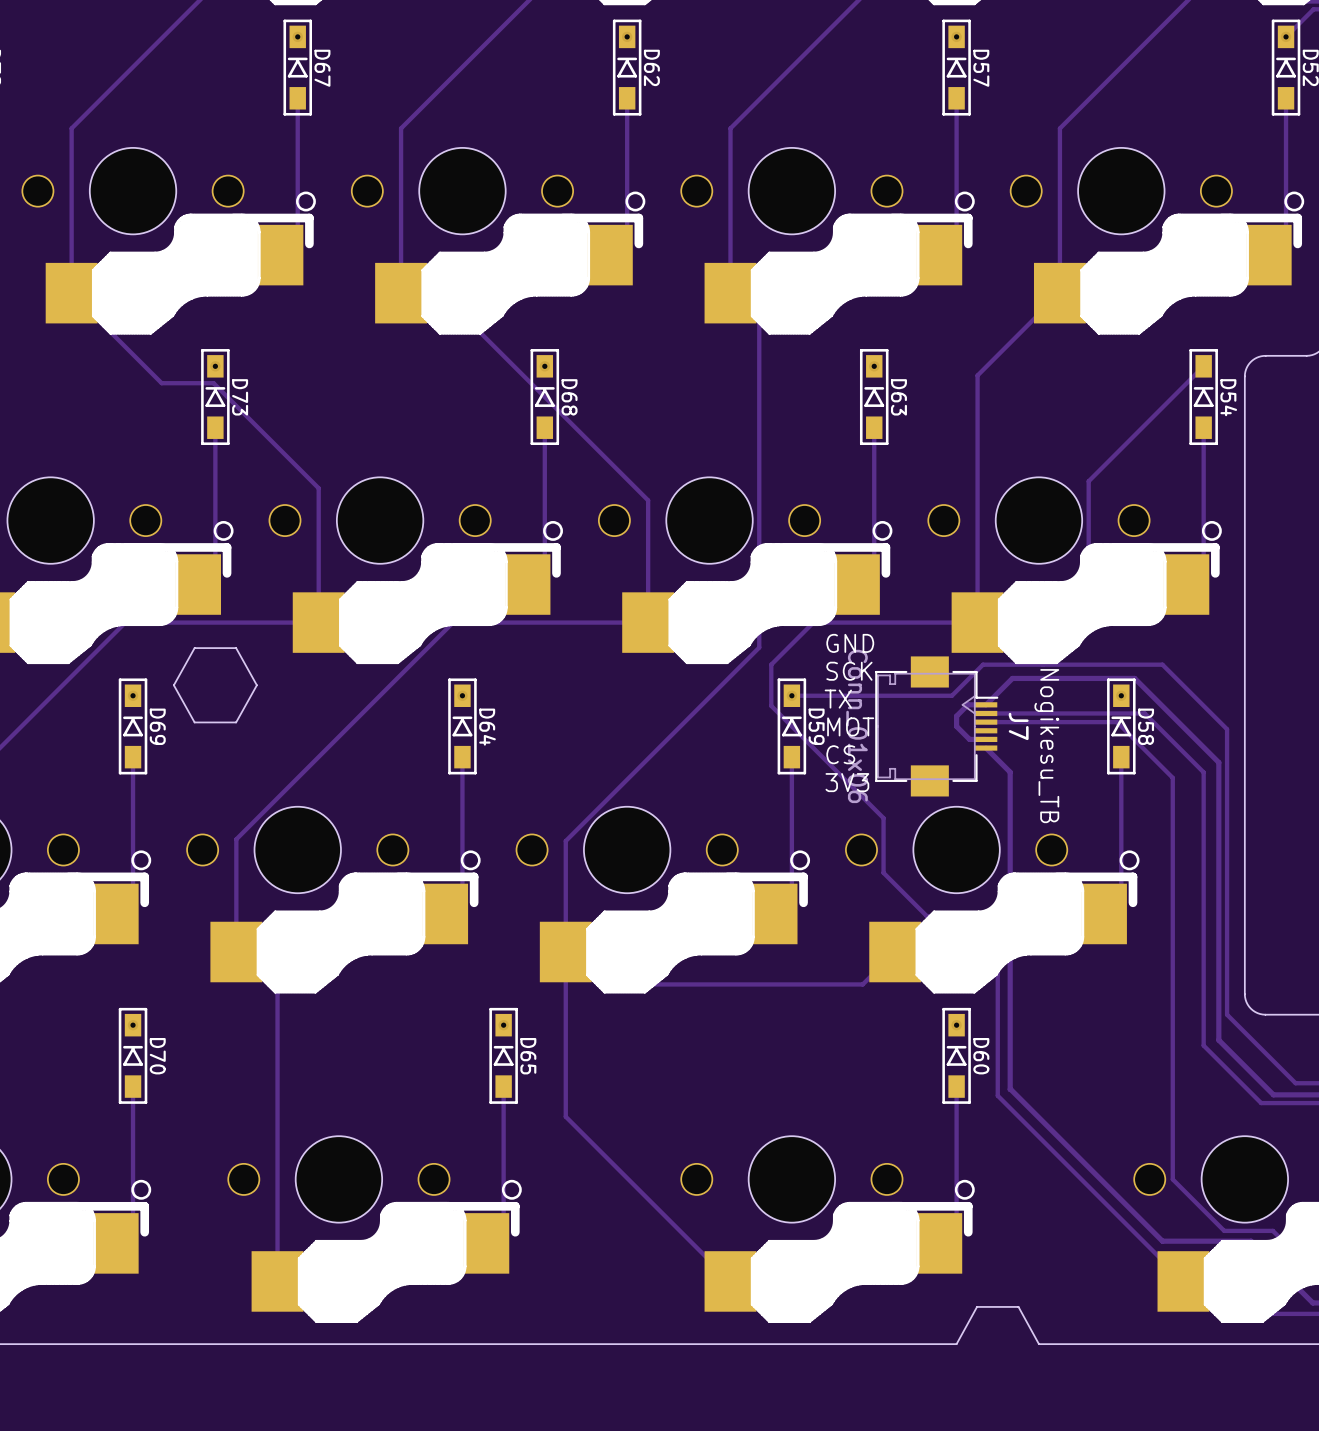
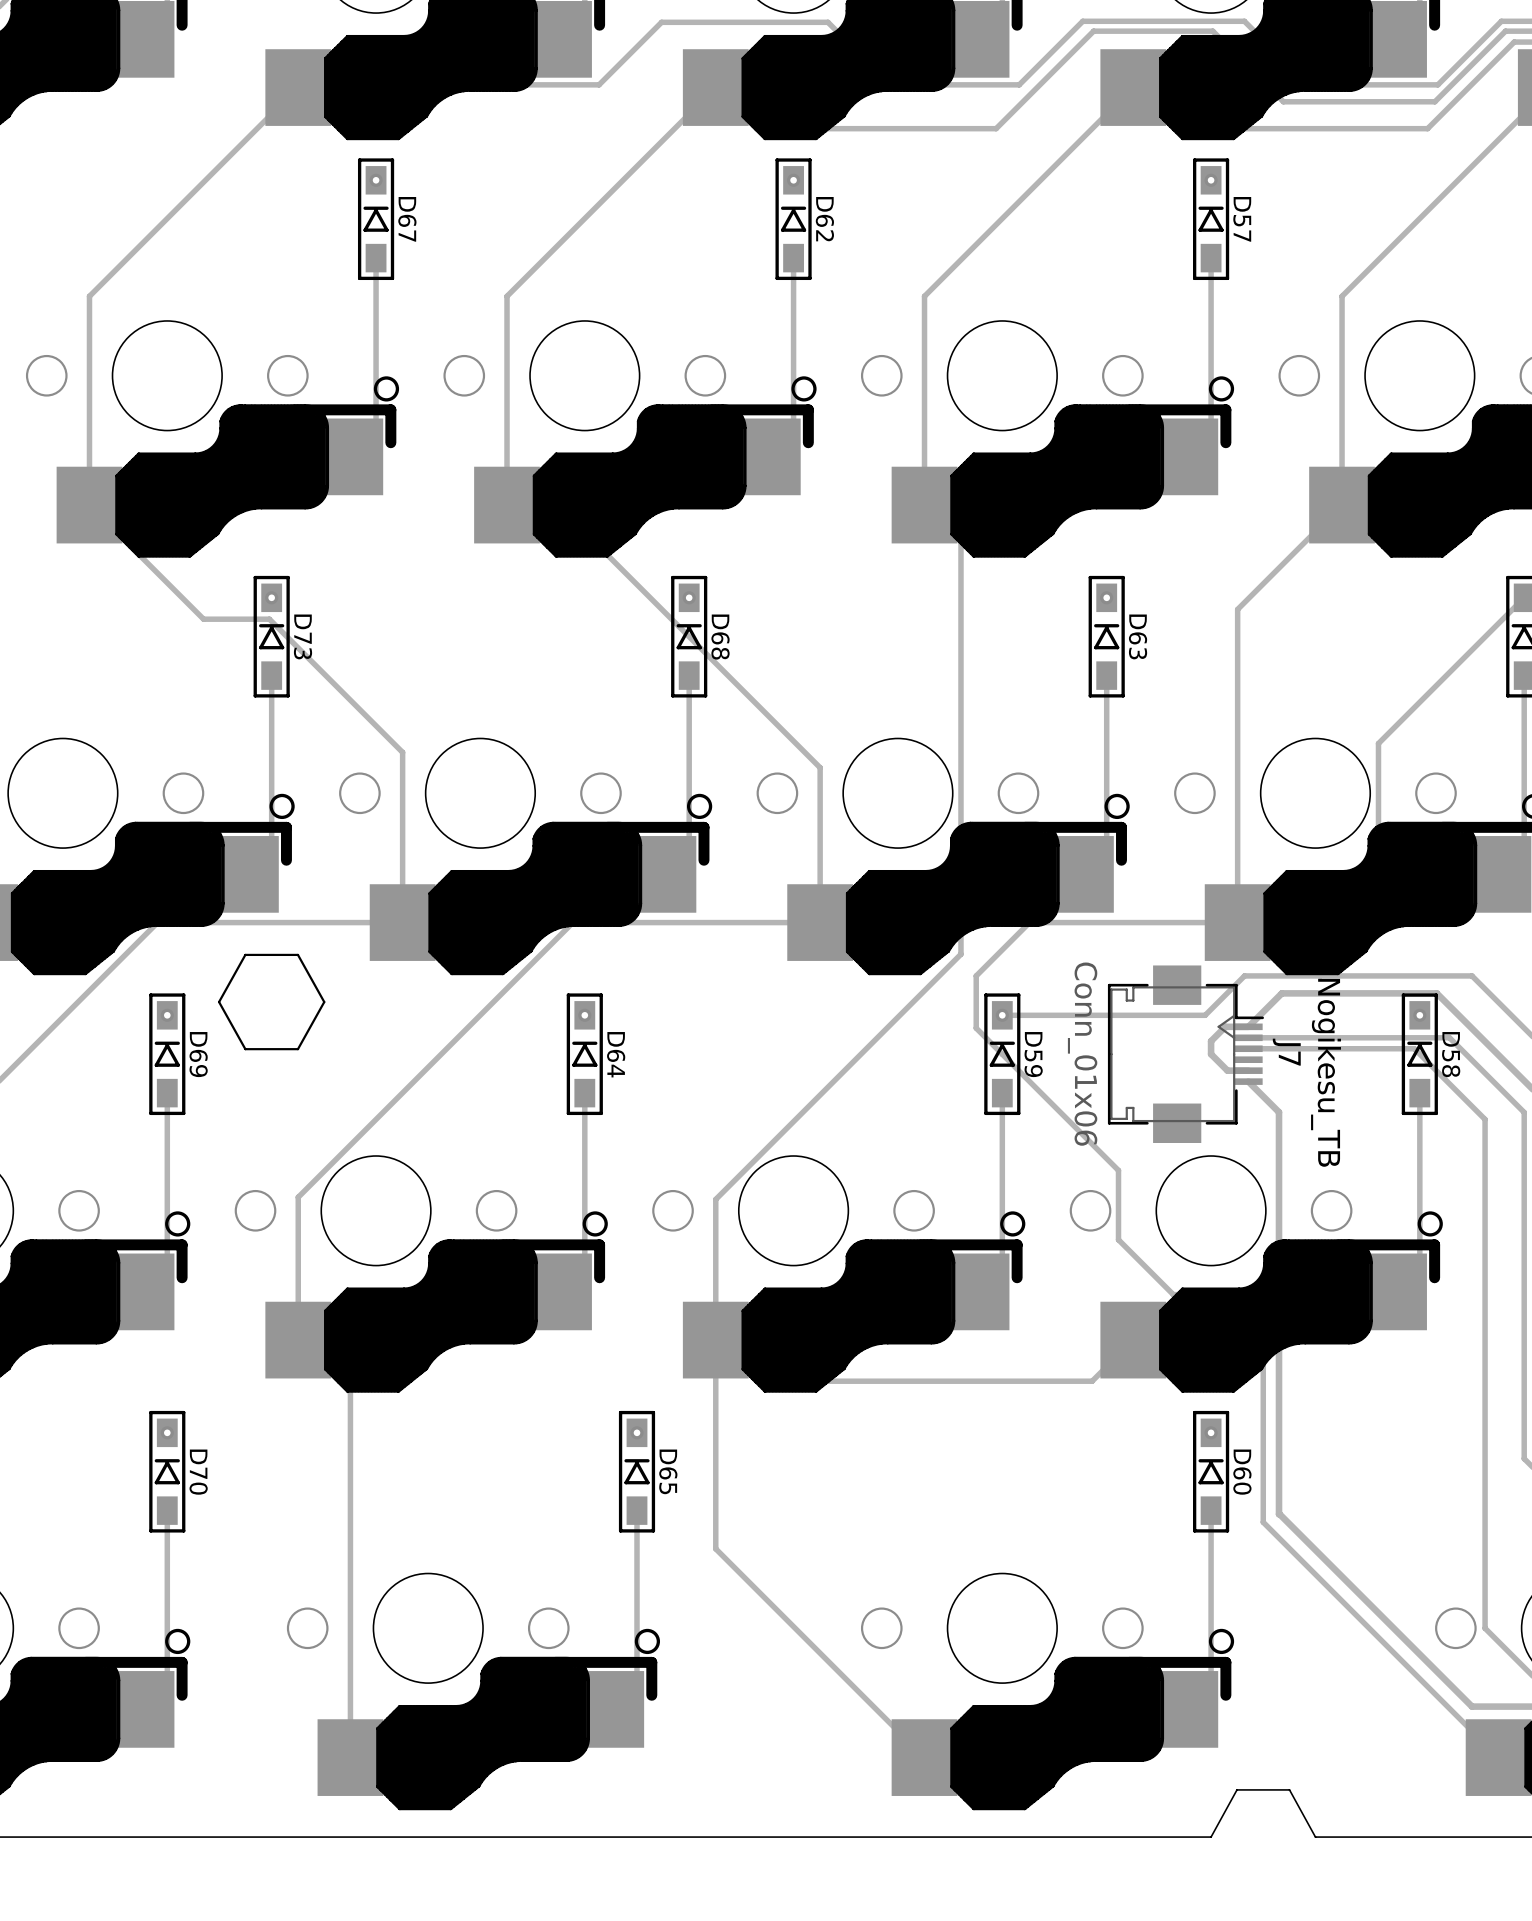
text: GND (850, 643) -> none
text: SCK (849, 671) -> none
text: TX (838, 699) -> none
text: MOT (850, 726) -> none
text: CS (840, 754) -> none
text: 3V3 (847, 782) -> none

